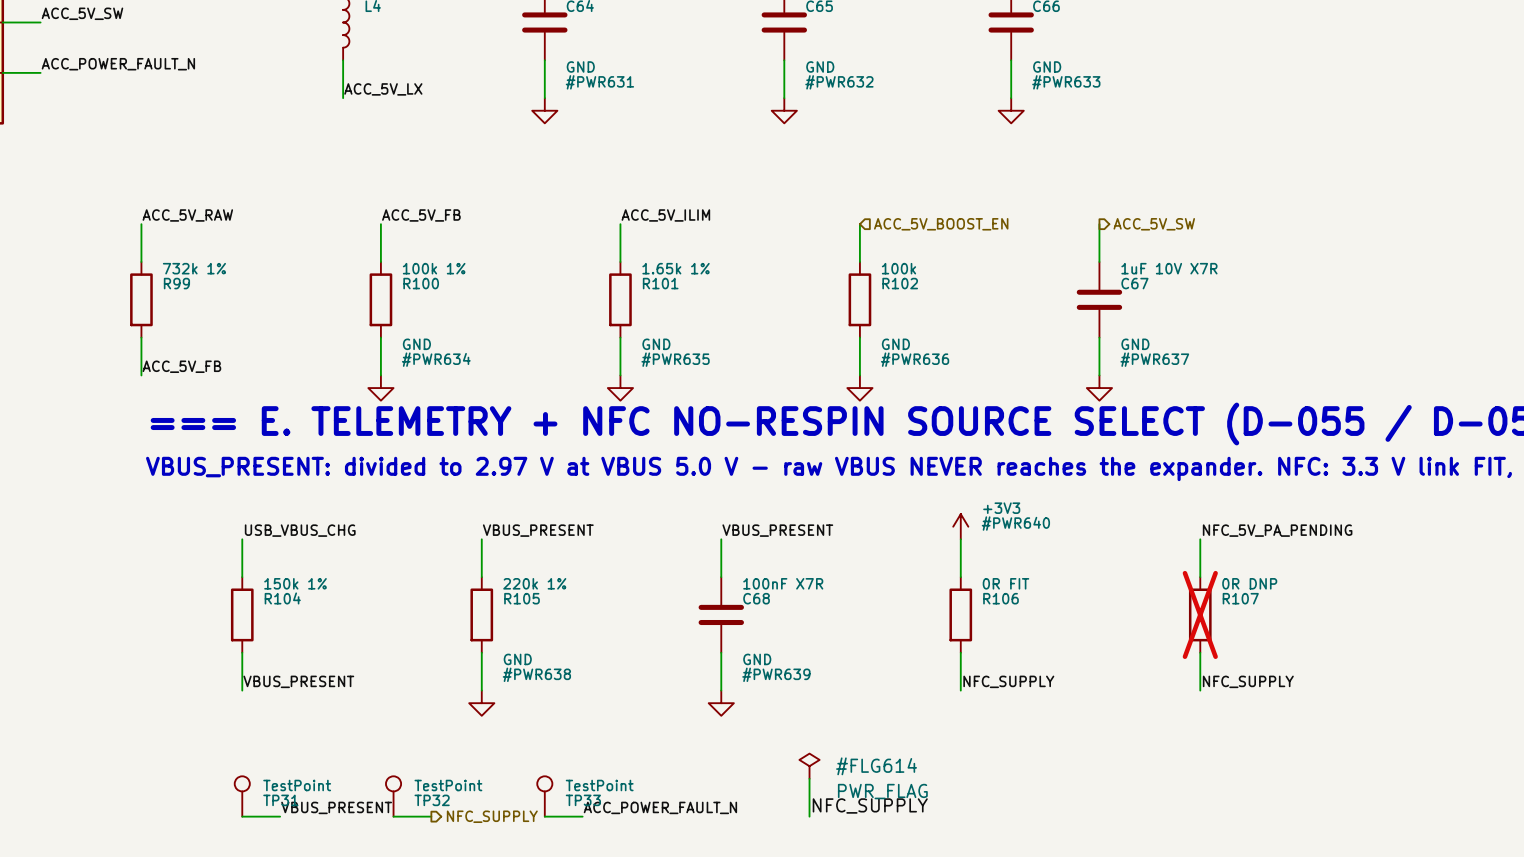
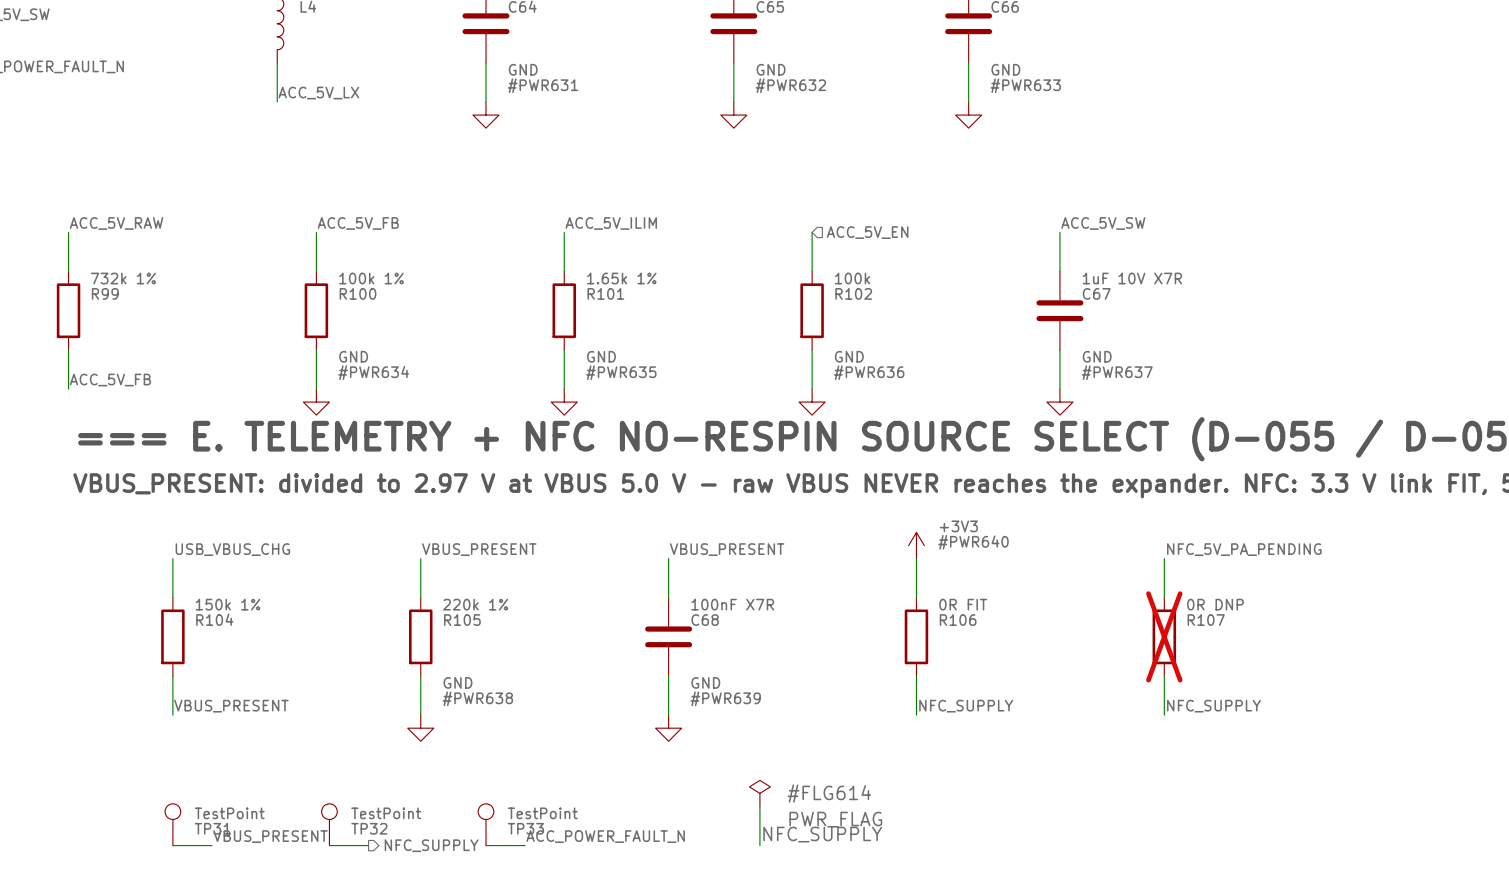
label: none -> ACC_5V_SW (1103, 223)
hierarchical label: ACC_5V_BOOST_EN (941, 224) -> ACC_5V_EN (867, 232)
hierarchical label: ACC_5V_SW (1154, 224) -> none

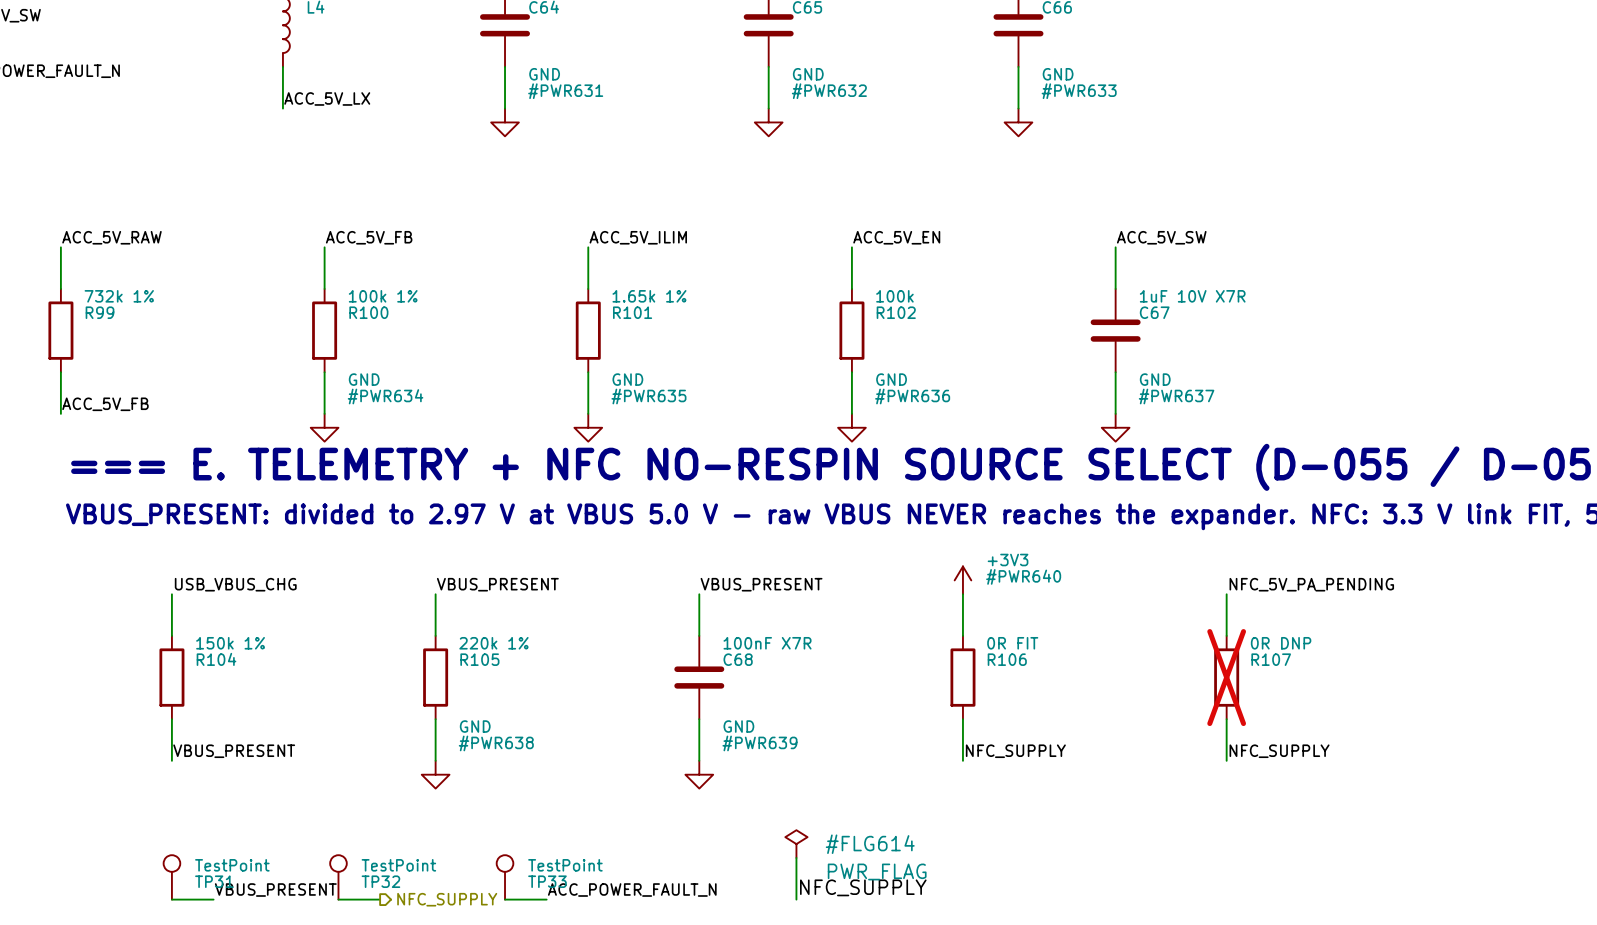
label: none -> ACC_5V_EN (896, 237)
hierarchical label: ACC_5V_EN (867, 232) -> none

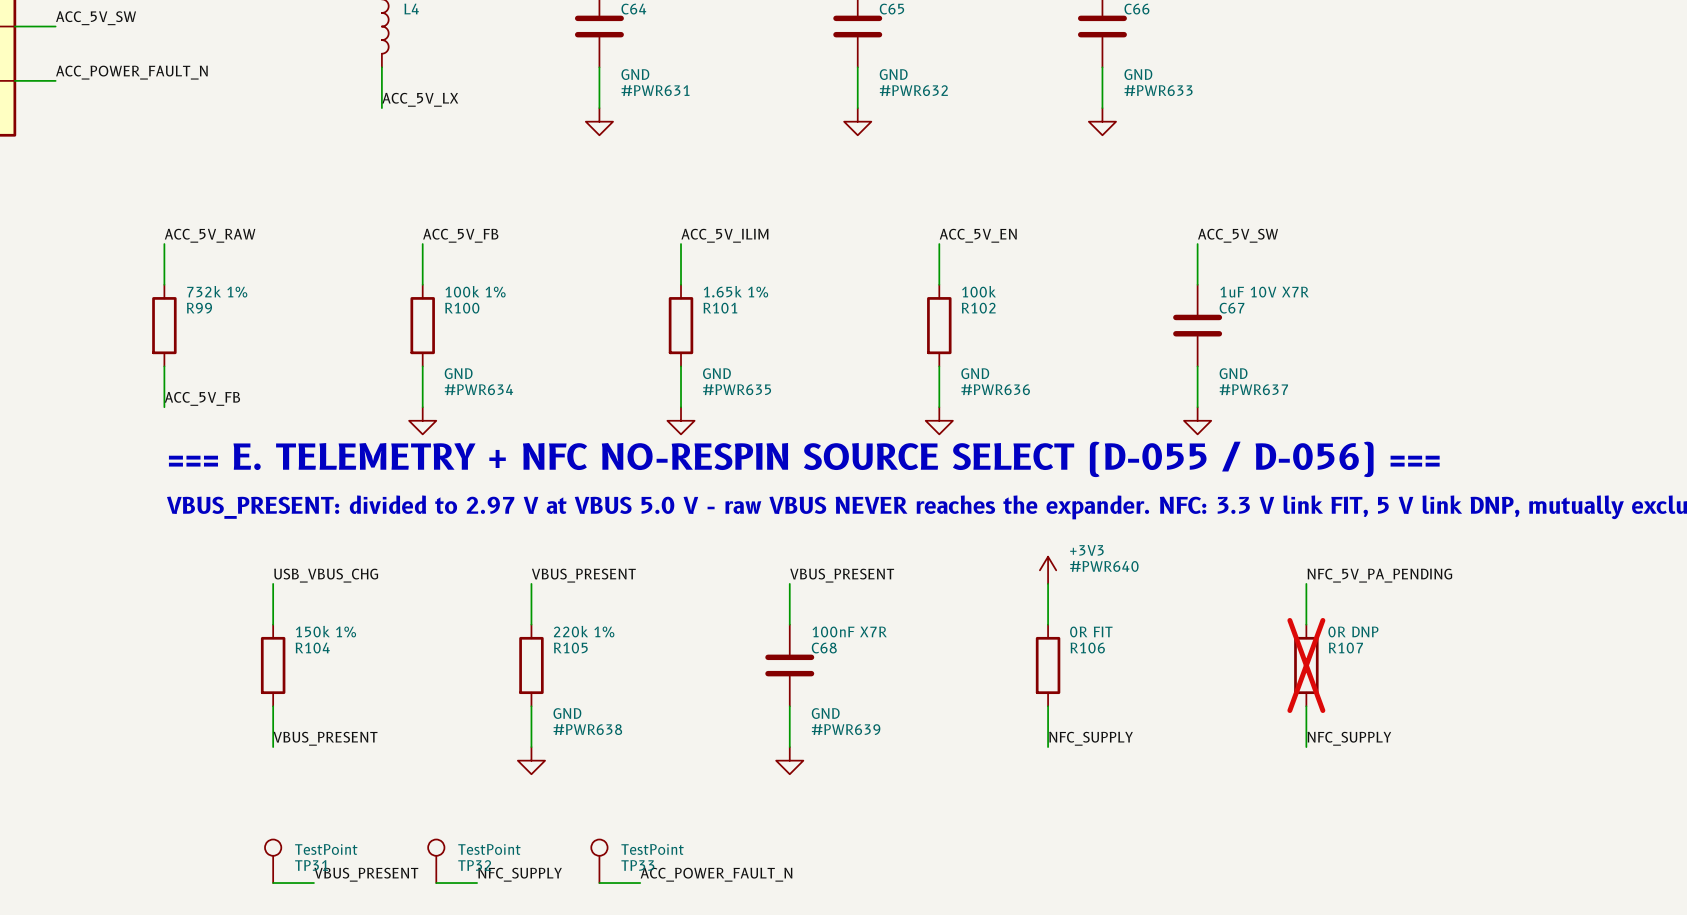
#FLG614: PWR_FLAG (796, 844) -> none
wire: (796, 857) (796, 899) -> none
label: NFC_SUPPLY (863, 887) -> none
label: none -> NFC_SUPPLY (520, 874)
hierarchical label: NFC_SUPPLY (447, 899) -> none

